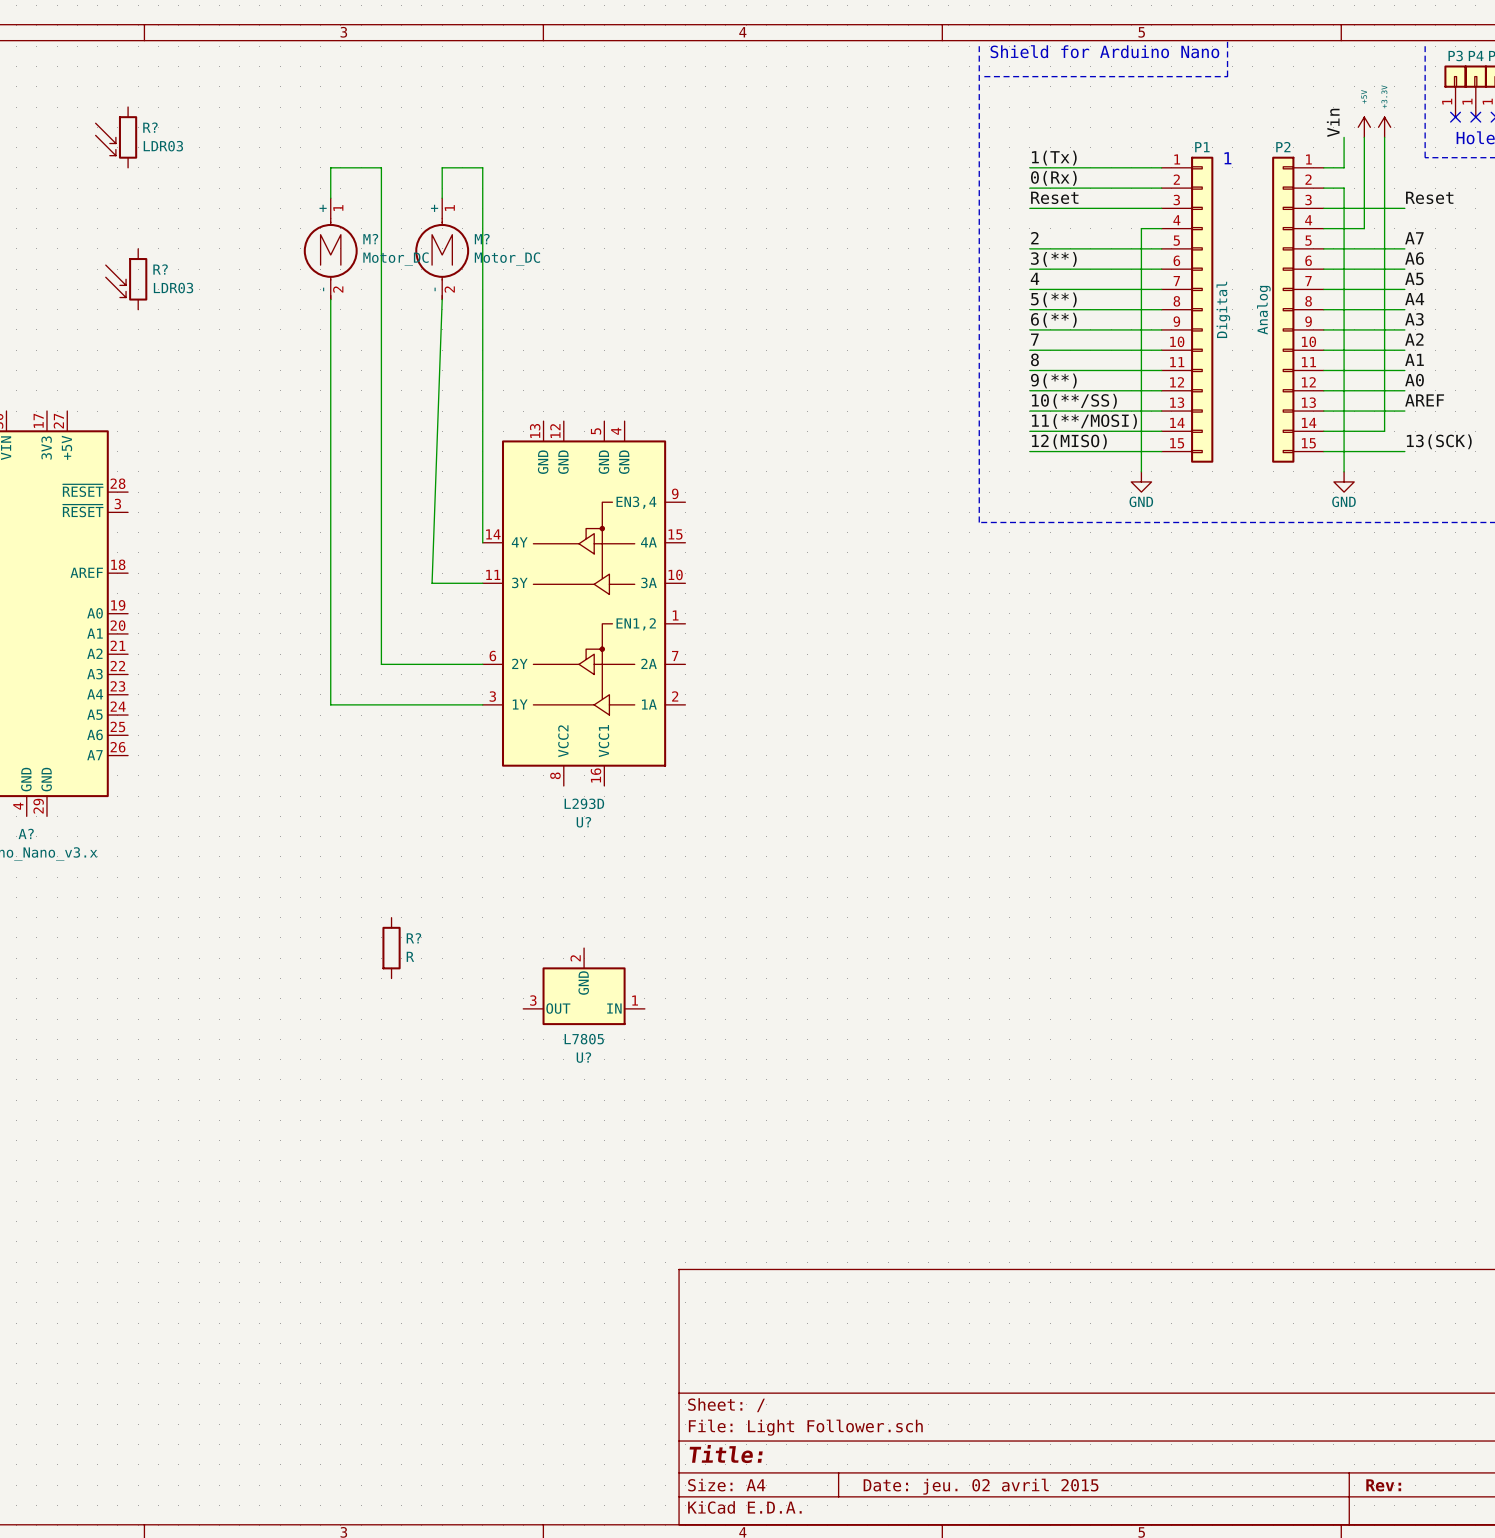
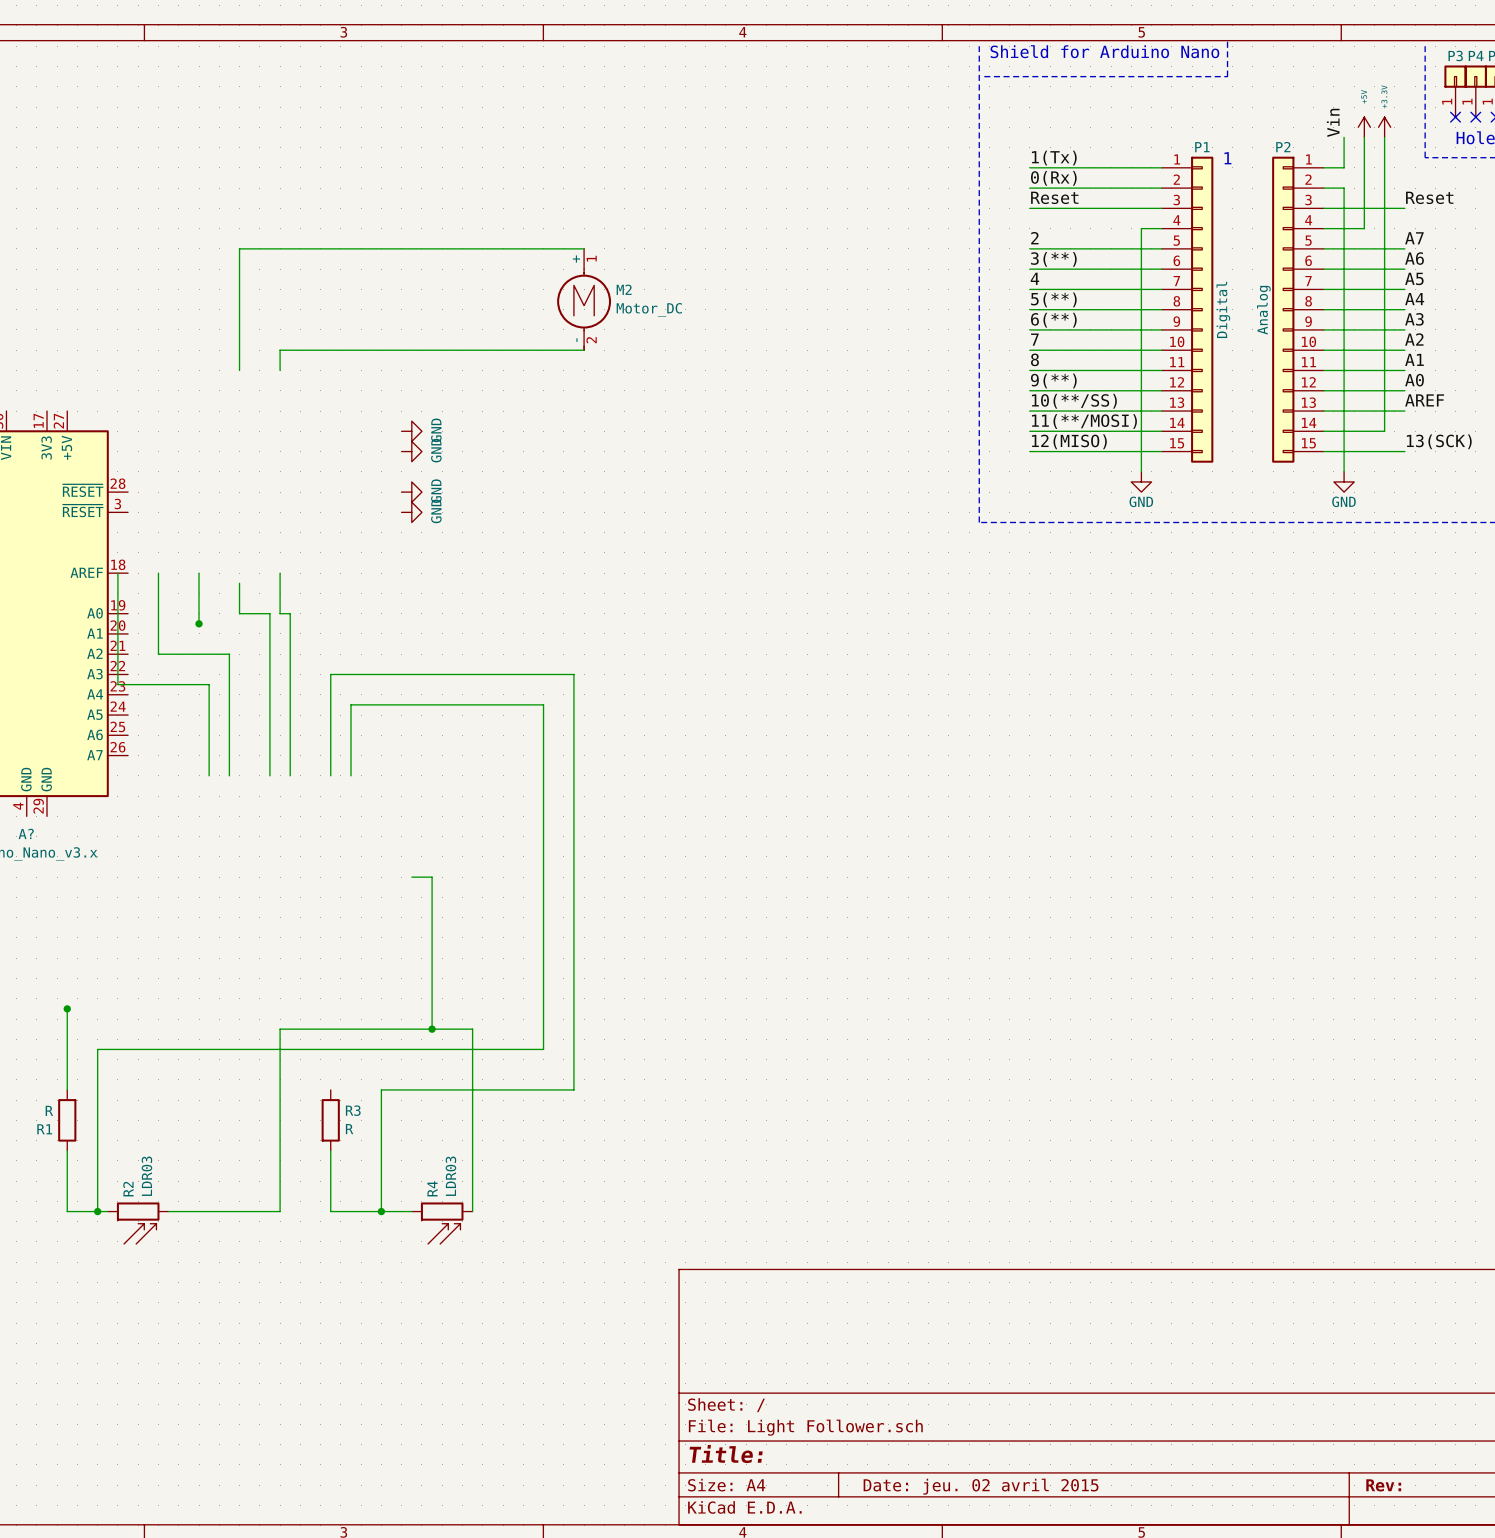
R?: LDR03 (116, 137) -> none
wire: (330, 198) (330, 167) (381, 167) (381, 664) (482, 664) -> none
wire: (442, 198) (442, 167) (482, 167) (482, 542) -> none
M?: Motor_DC (330, 248) -> none
M?: Motor_DC (442, 248) -> none
wire: none -> (584, 248) (239, 248) (239, 370)
R?: LDR03 (126, 279) -> none
wire: (330, 299) (330, 674) -> (381, 1211) (381, 1089) (573, 1089) (573, 674) (330, 674)
wire: (442, 299) (432, 583) (482, 583) -> none
M2: none -> Motor_DC (584, 299)
wire: none -> (584, 350) (280, 350) (280, 370)
power symbol: none -> GND (411, 431)
power symbol: none -> GND (411, 451)
power symbol: none -> GND (411, 492)
power symbol: none -> GND (411, 512)
wire: none -> (117, 573) (117, 684) (209, 684) (209, 775)
wire: none -> (158, 573) (158, 654) (229, 654) (229, 775)
wire: none -> (199, 573) (199, 623)
wire: none -> (280, 573) (280, 613) (290, 613) (290, 775)
wire: none -> (239, 583) (239, 613) (269, 613) (269, 775)
U?: L293D (584, 603) -> none
junction: none -> (199, 623)
wire: (330, 704) (351, 704) -> (330, 704) (330, 775)
wire: none -> (351, 704) (351, 775)
wire: none -> (482, 704) (543, 704) (543, 1049) (97, 1049) (97, 1211)
wire: none -> (411, 877) (432, 877) (432, 1029)
R?: R (391, 948) -> none
U?: L7805 (584, 986) -> none
wire: none -> (67, 1008) (67, 1089)
junction: none -> (67, 1008)
junction: none -> (432, 1029)
R1: none -> R (67, 1120)
R3: none -> R (330, 1120)
wire: none -> (67, 1150) (67, 1211) (107, 1211)
wire: none -> (330, 1150) (330, 1211) (411, 1211)
junction: none -> (97, 1211)
wire: none -> (168, 1211) (280, 1211) (280, 1029) (472, 1029) (472, 1211)
junction: none -> (381, 1211)
R2: none -> LDR03 (138, 1223)
R4: none -> LDR03 (442, 1223)

